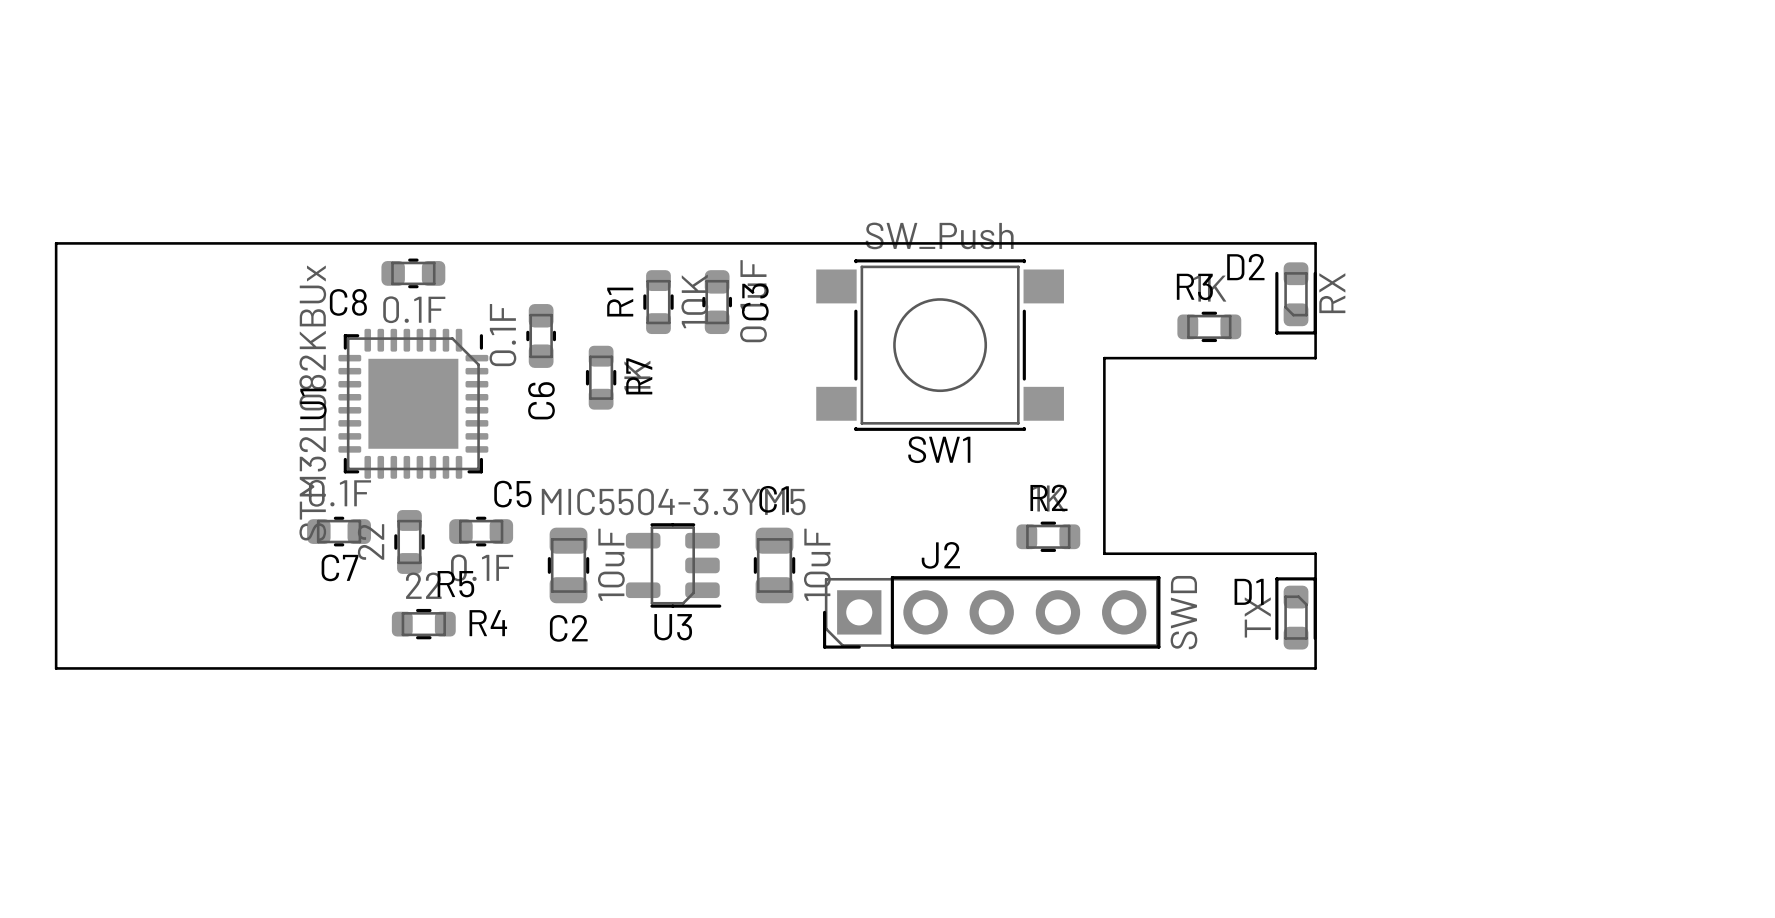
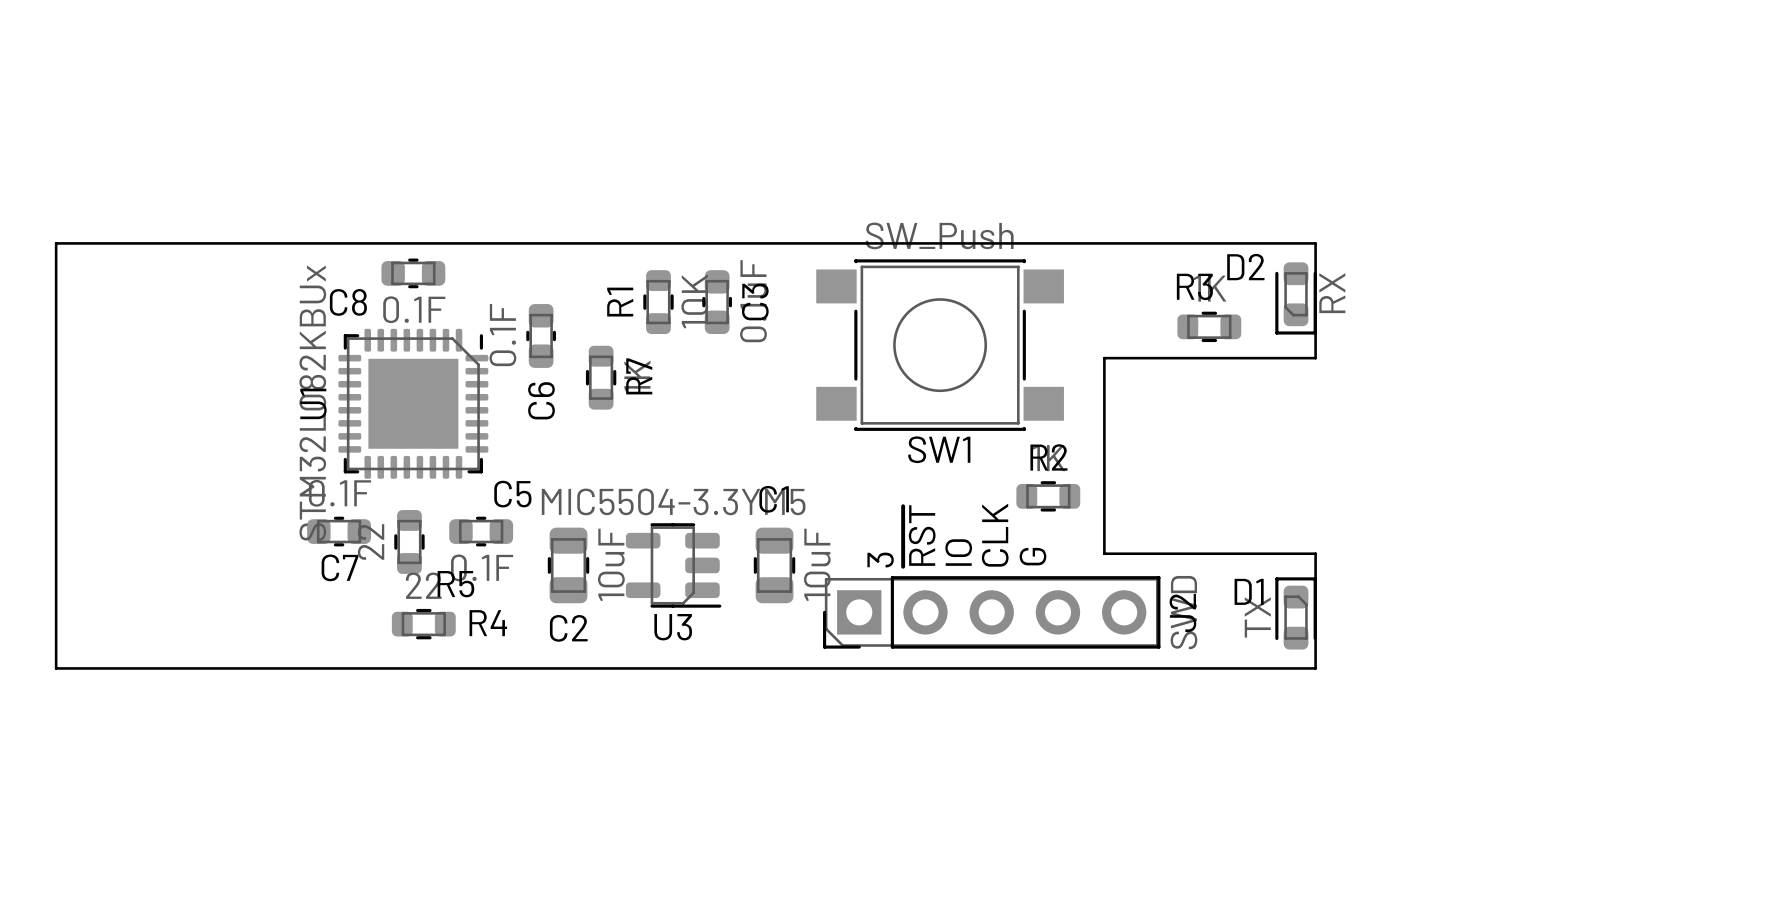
text: none -> ~{RST} (919, 535)
text: none -> CLK (995, 535)
R2 position: (1048, 536) -> (1048, 496)
text: none -> IO (958, 552)
J2 name rotation: 0° (940, 555) -> 90° counterclockwise (1182, 612)
J2 name position: J2 (940, 555) -> J2 (1182, 612)
text: none -> G (1032, 556)
text: none -> 3 (880, 560)

